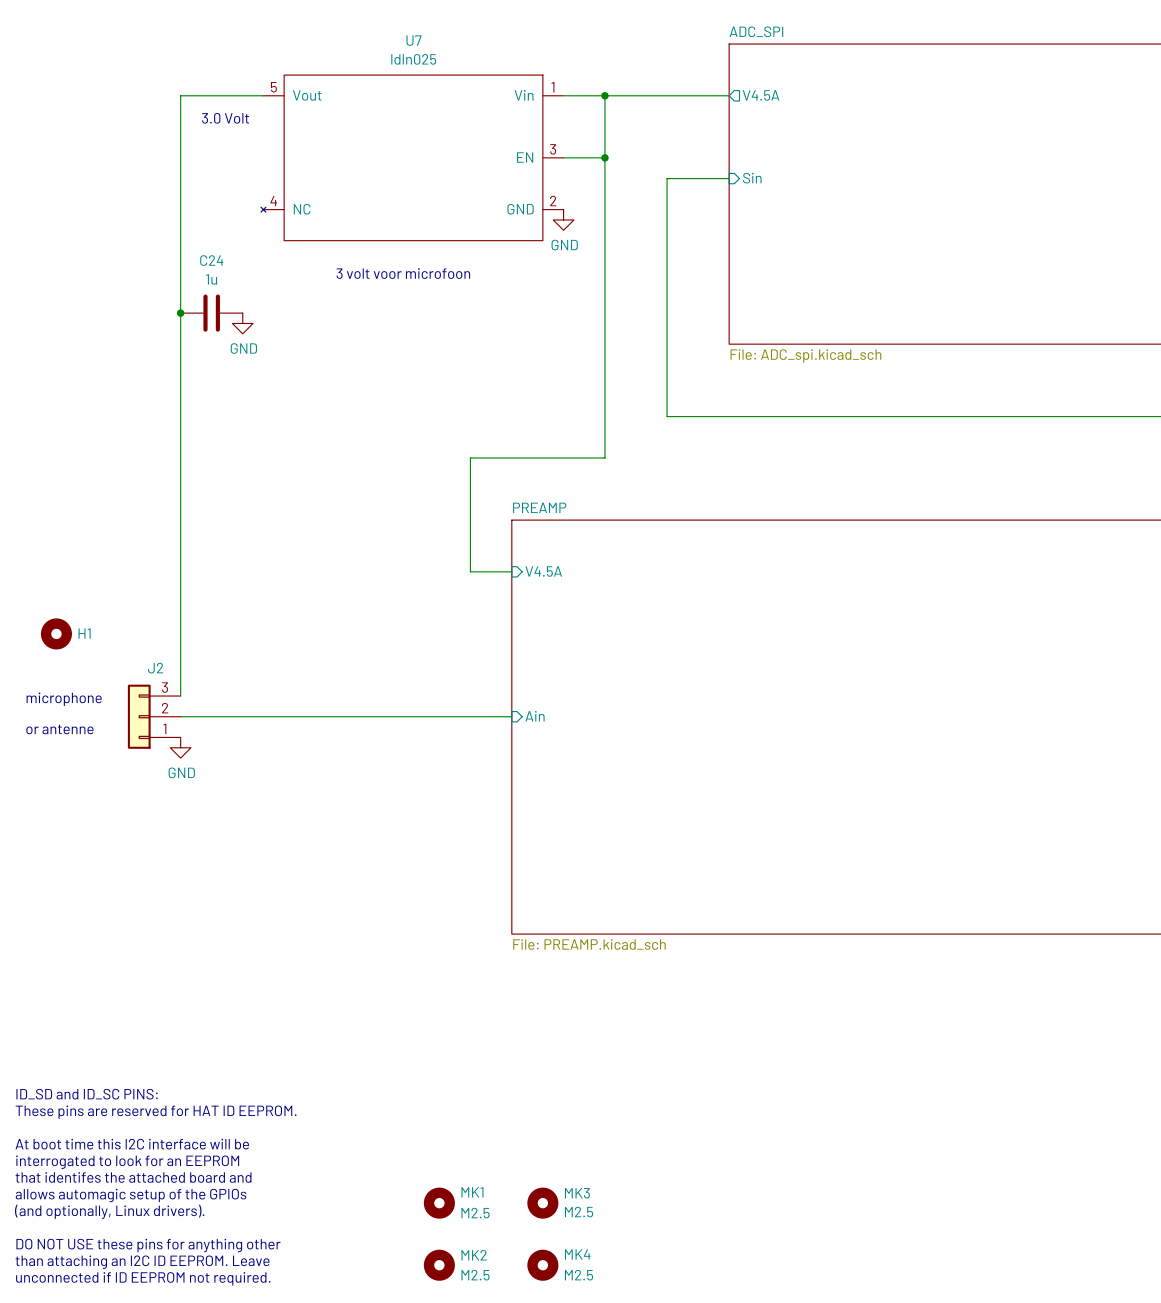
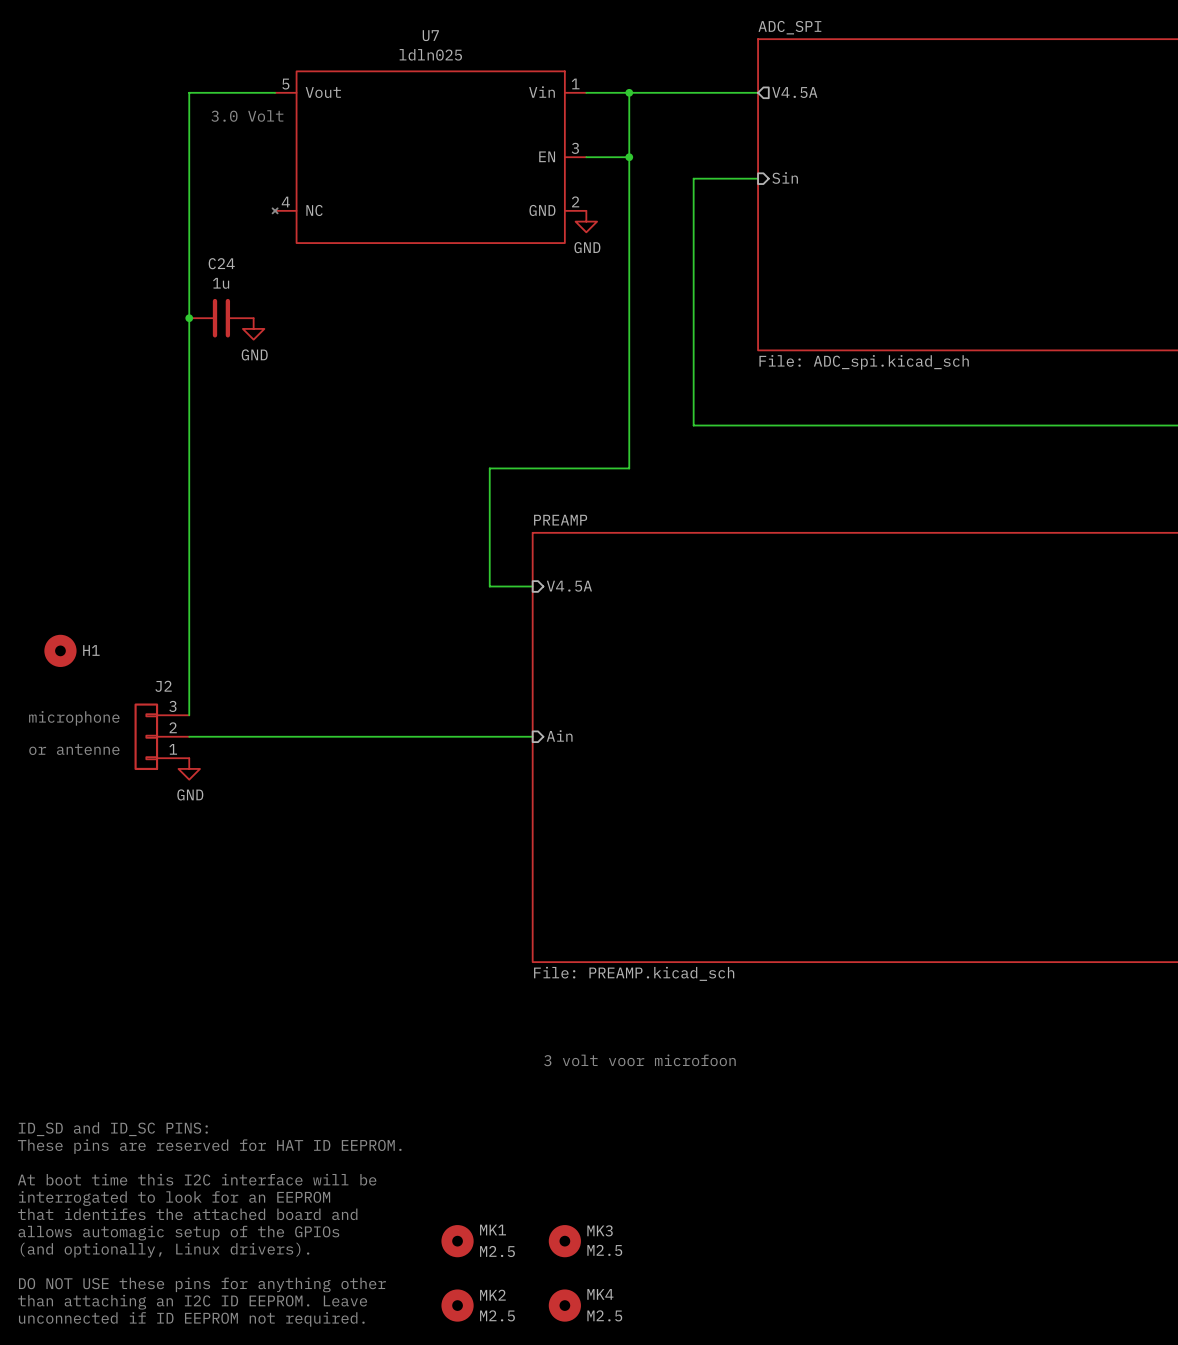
text: 3 volt voor microfoon (403, 273) -> none
text: none -> 3 volt voor microfoon (639, 1060)

